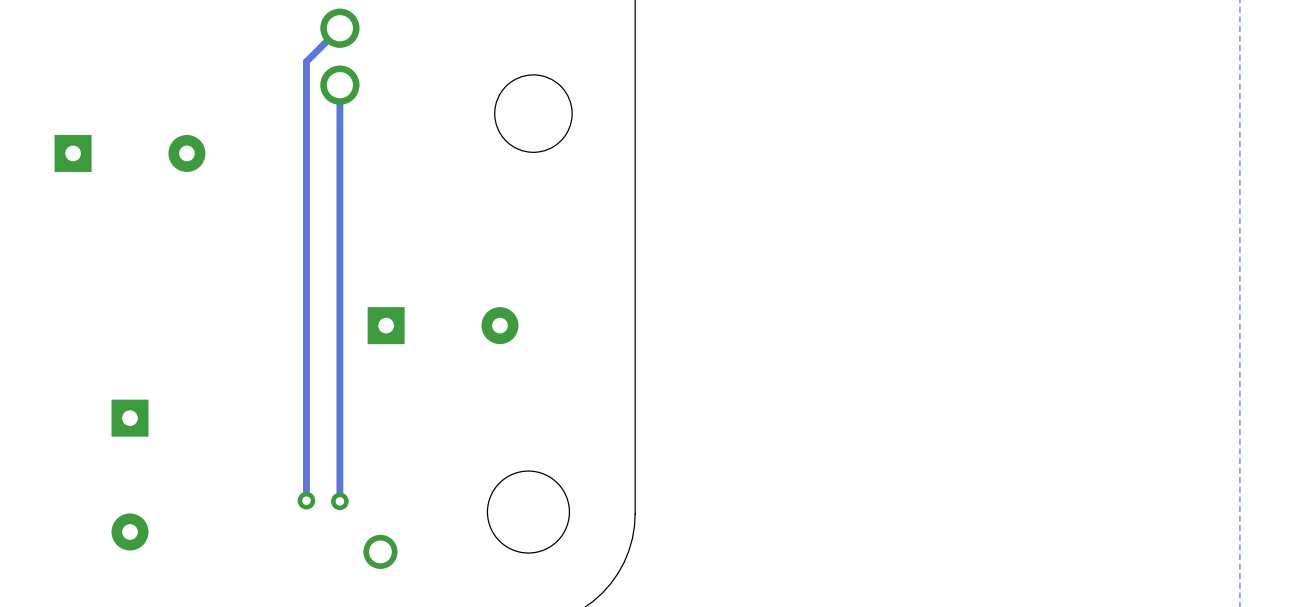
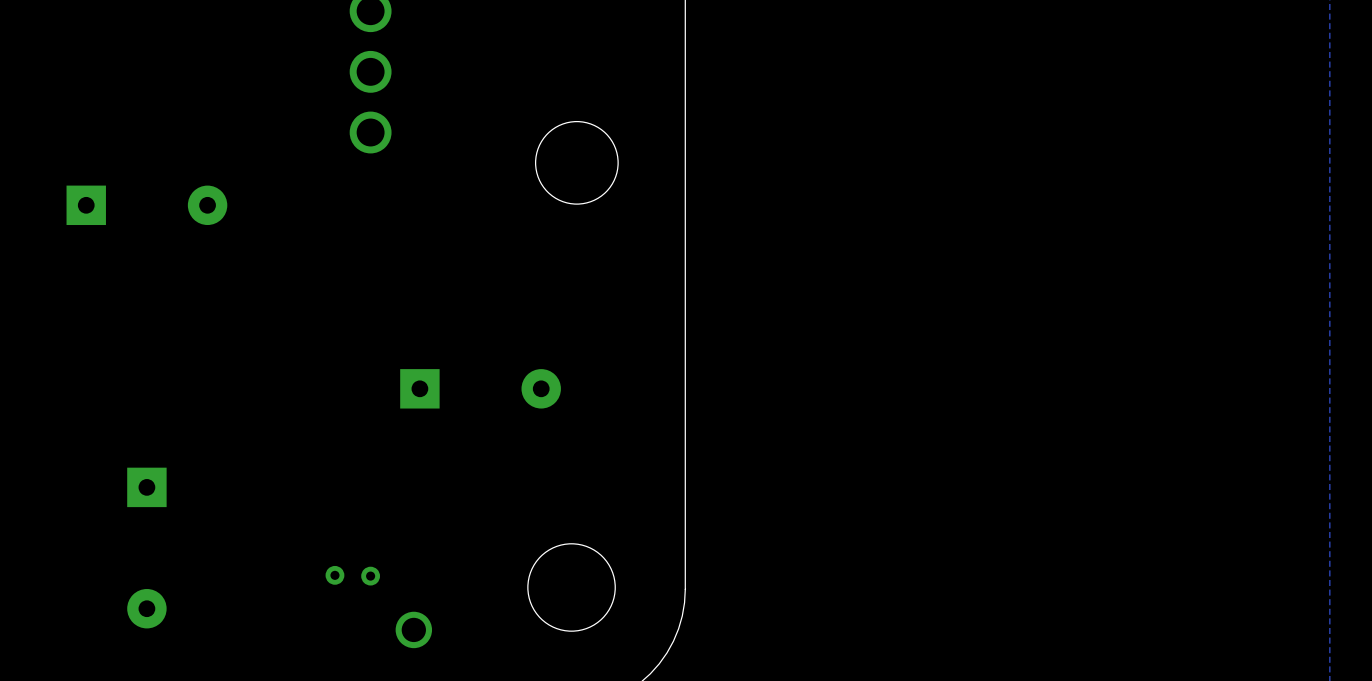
track: (339, 28) (306, 61) (306, 500) -> none
track: (339, 85) (339, 501) -> none

